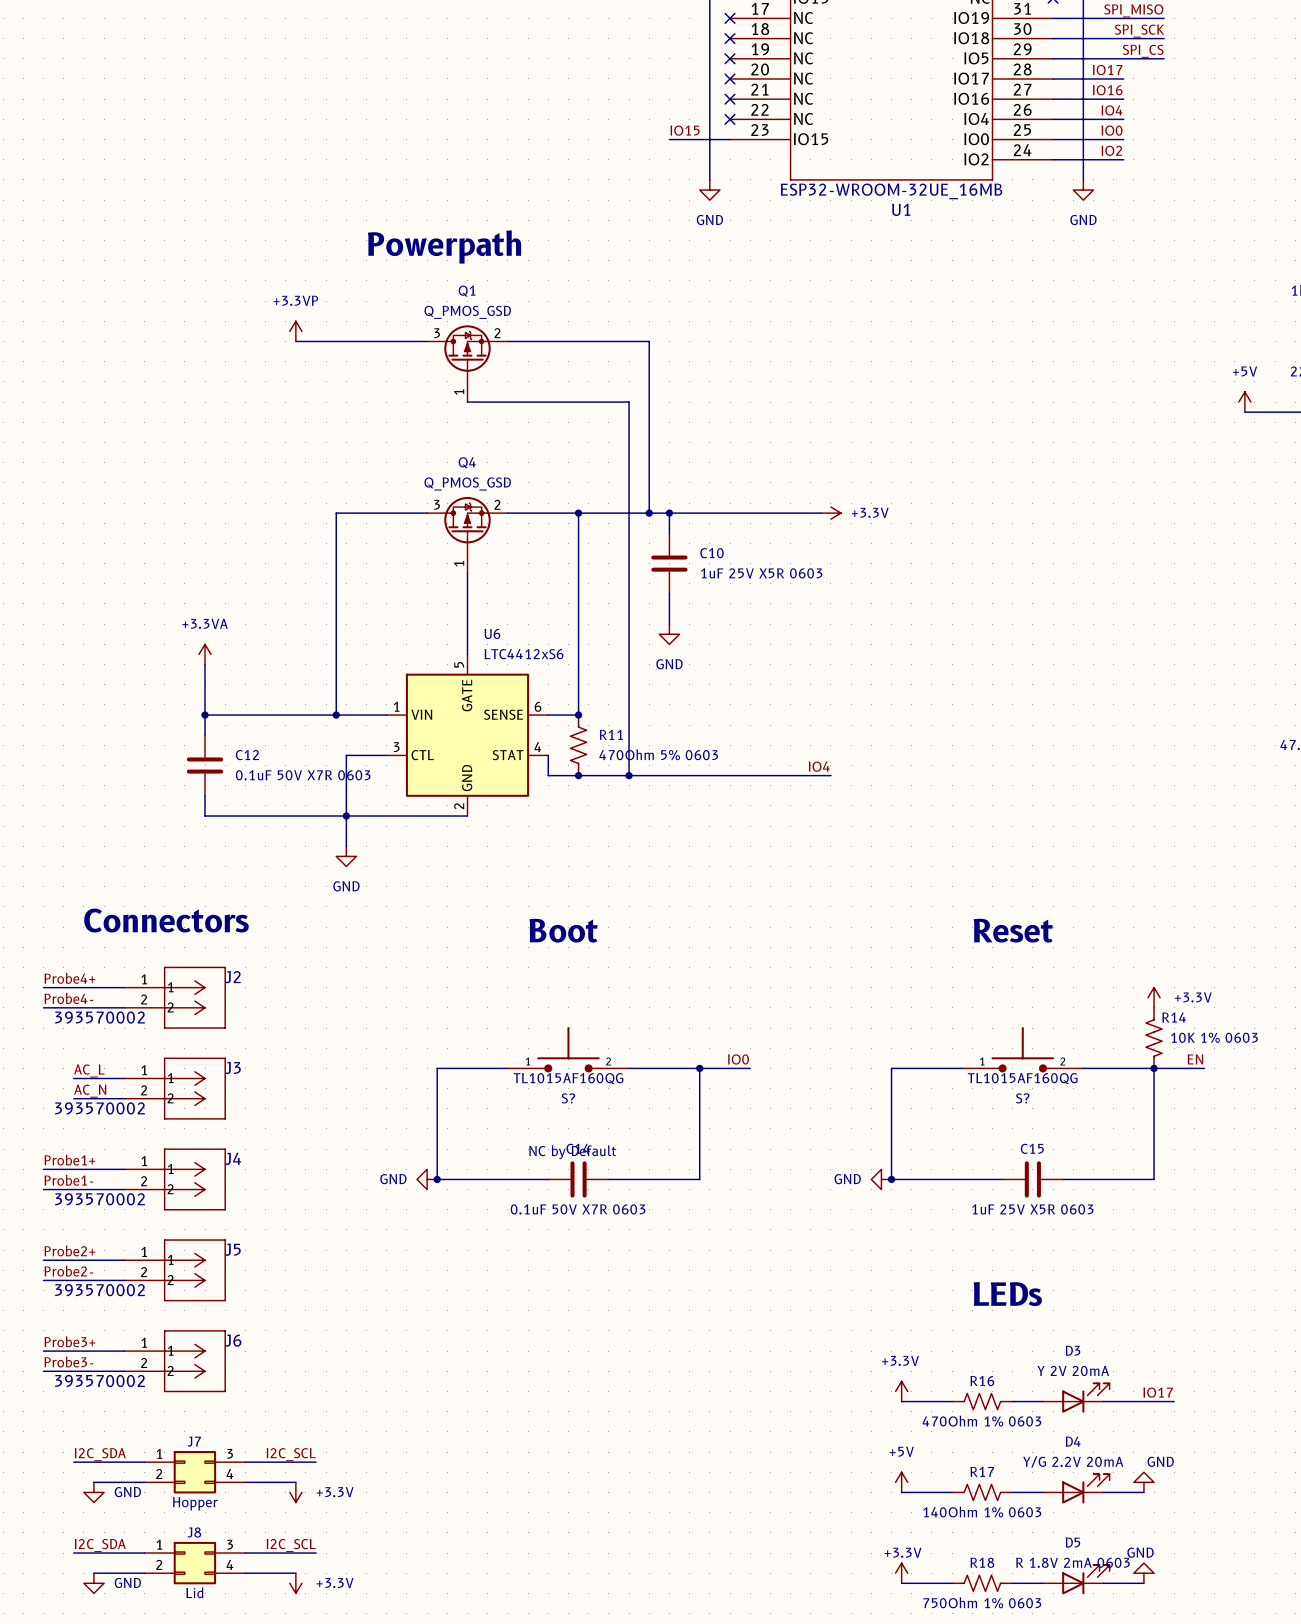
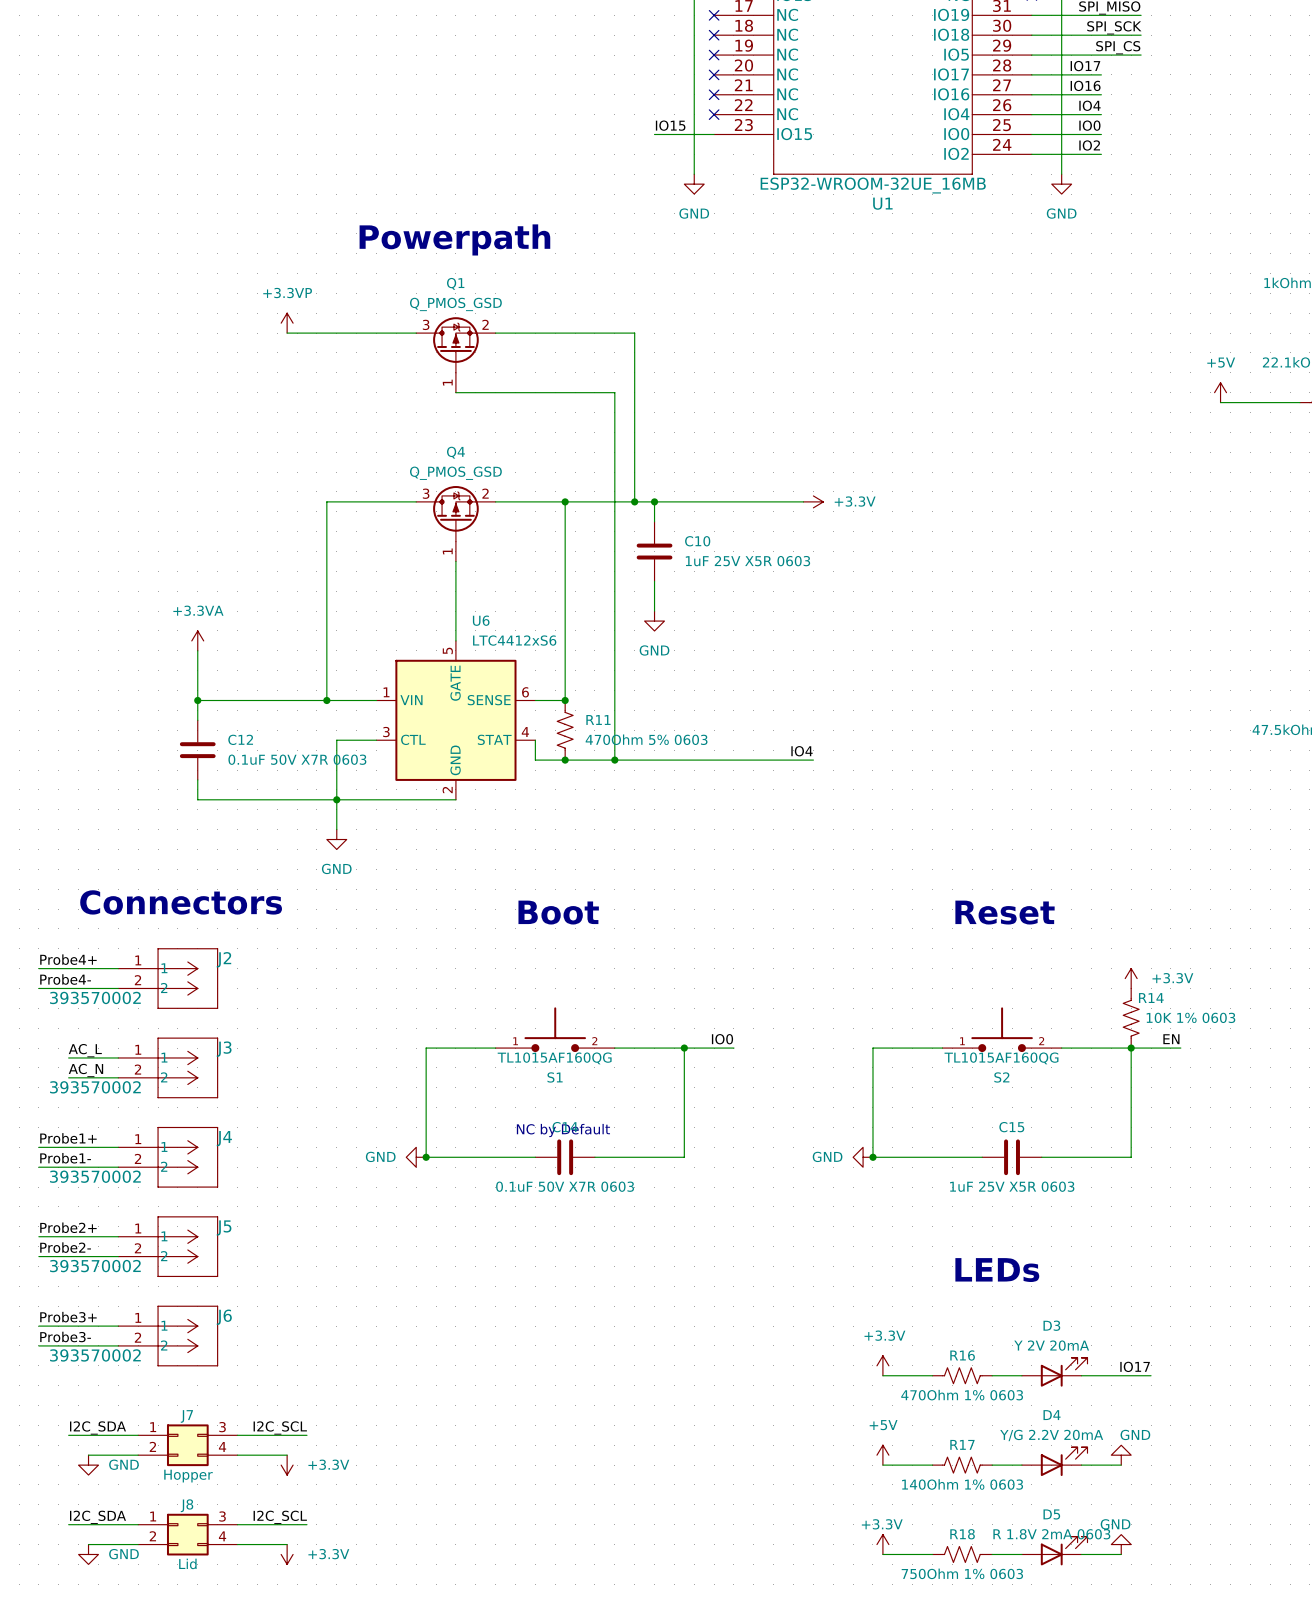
S? name: S? (568, 1098) -> S1 (555, 1077)
S? name: S? (1022, 1098) -> S2 (1001, 1077)

